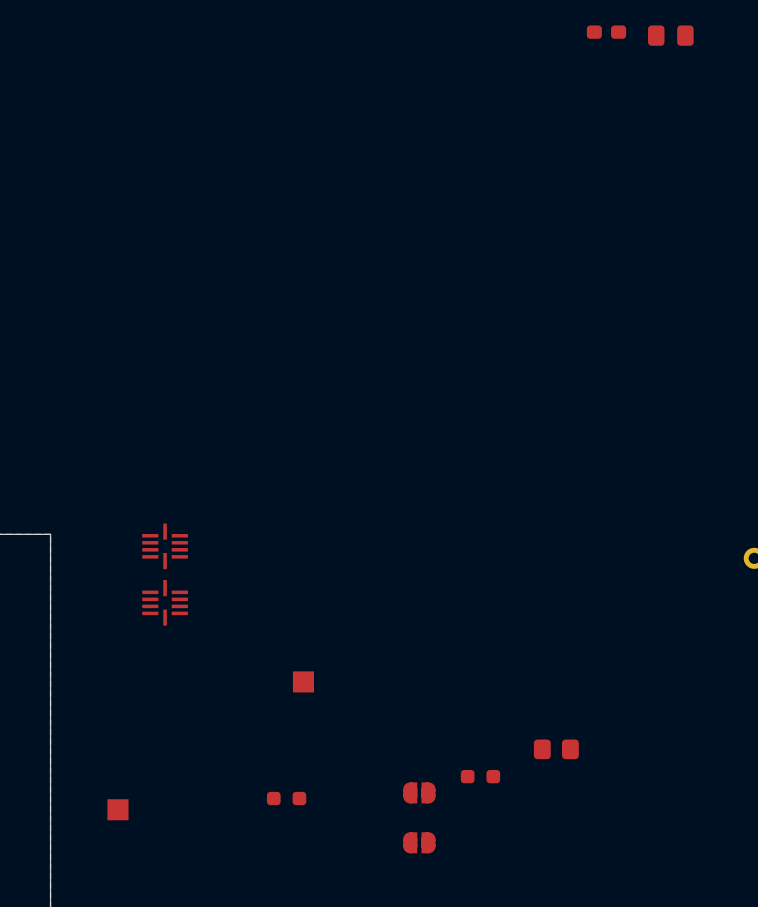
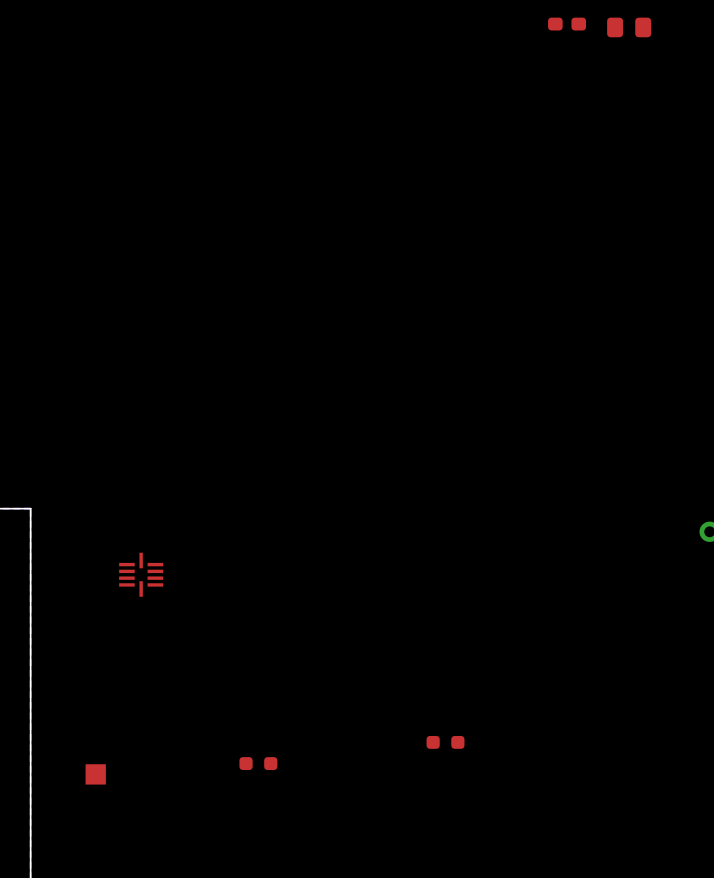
part: (165, 546) -> none
part: (303, 681) -> none
part: (556, 749) -> none
part: (419, 792) -> none
part: (419, 842) -> none

